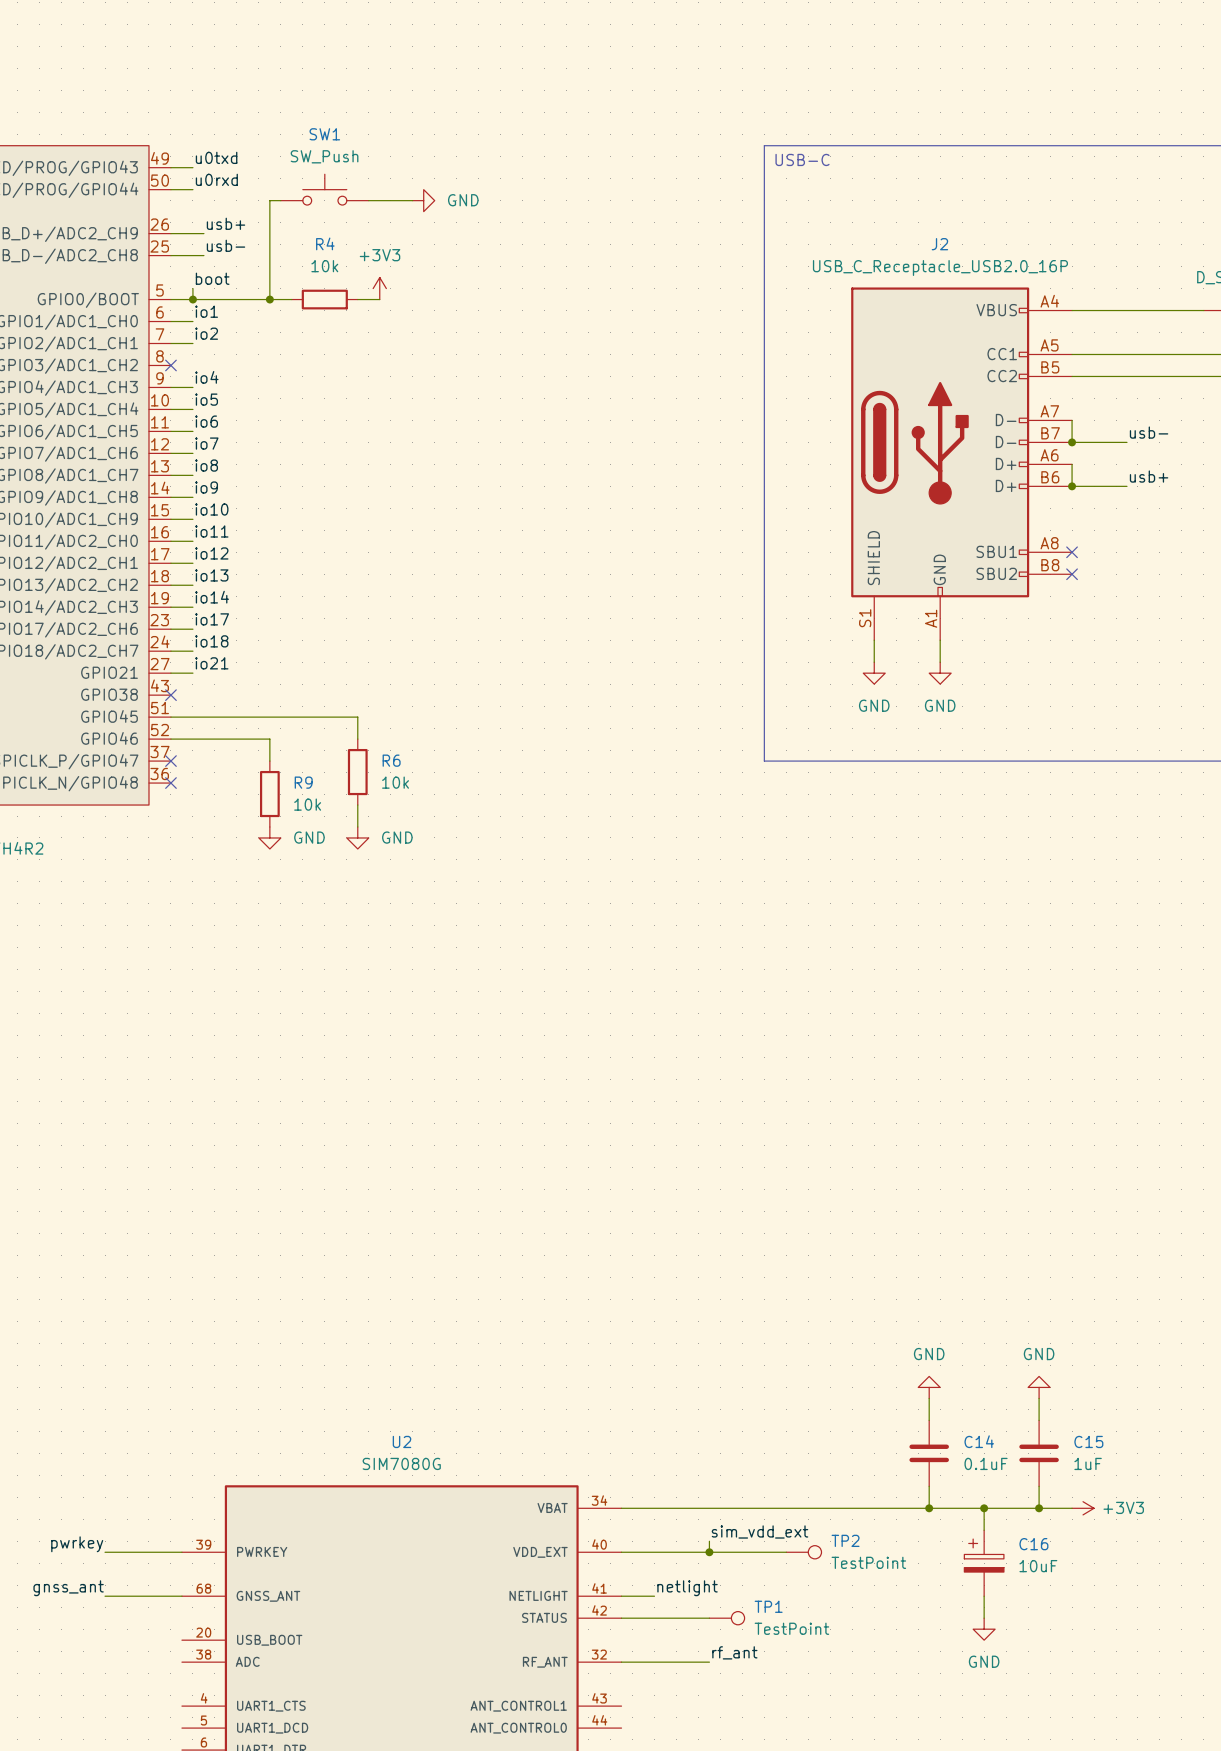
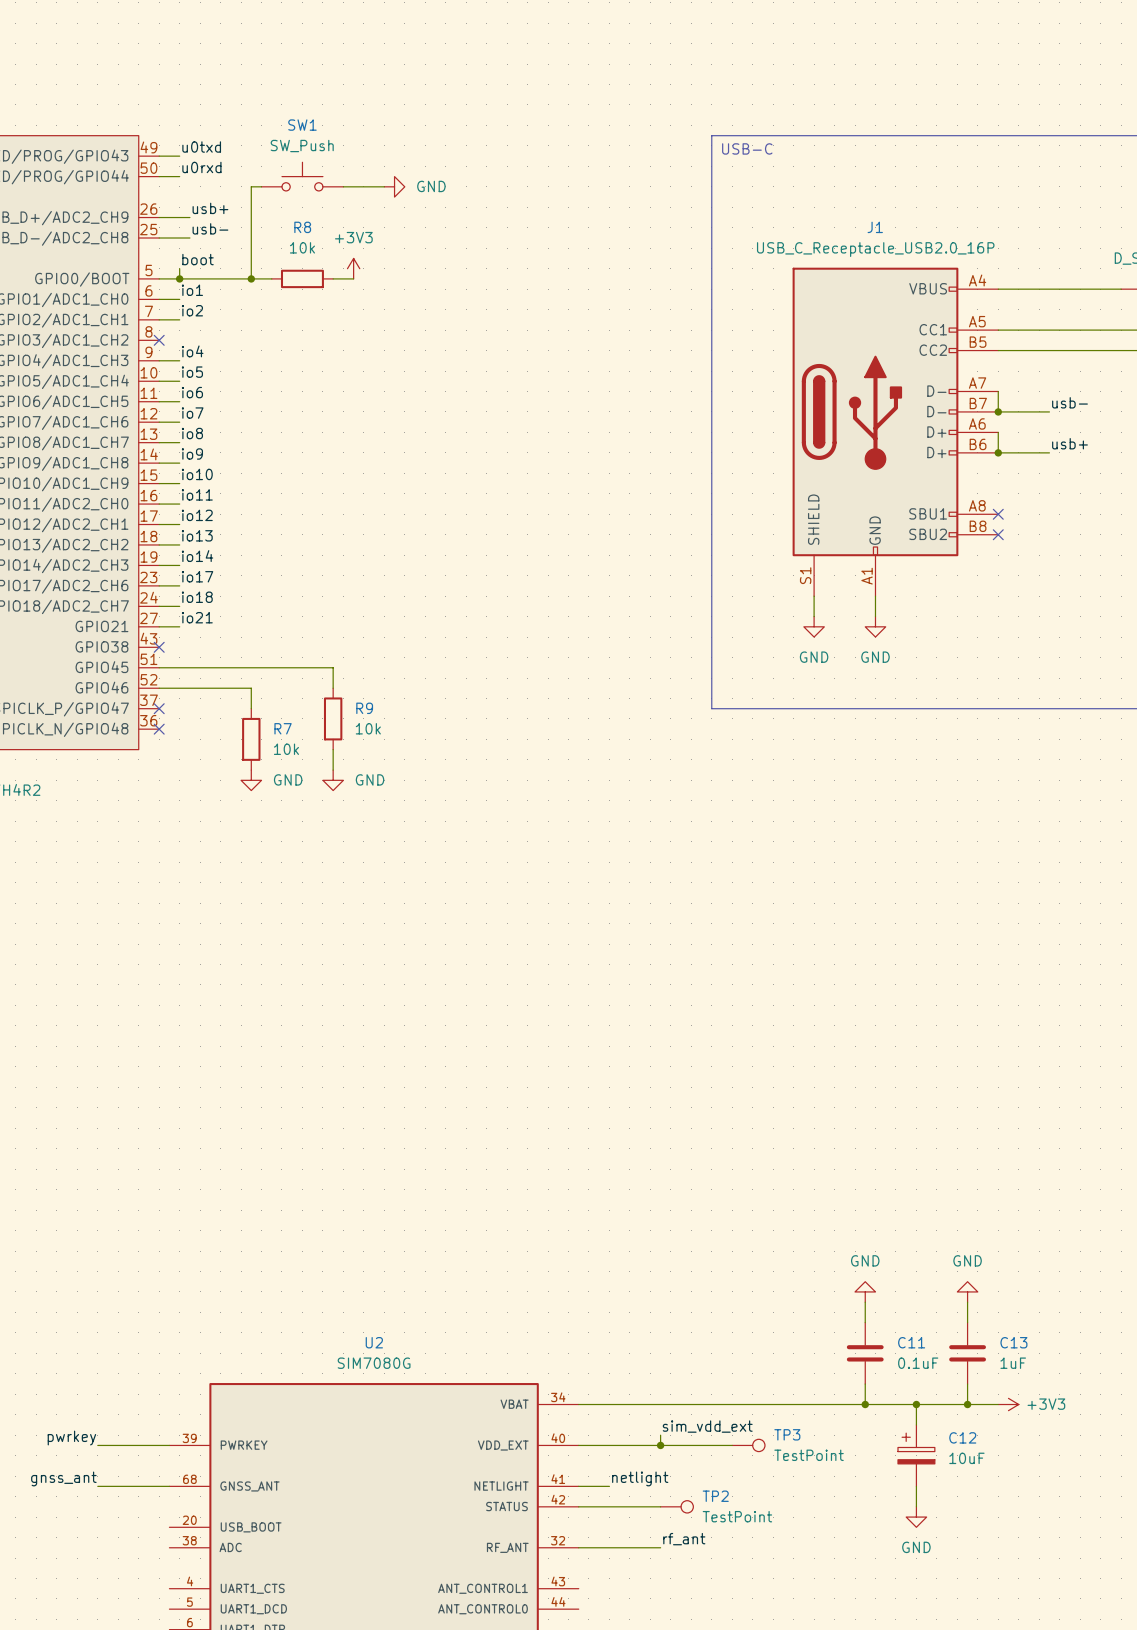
R4 name: R4 (325, 243) -> R8 (302, 227)
J2 name: J2 (939, 244) -> J1 (875, 227)
R6 name: R6 (391, 760) -> R9 (364, 708)
R9 name: R9 (303, 782) -> R7 (283, 728)
C14 name: C14 (979, 1441) -> C11 (911, 1342)
C15 name: C15 (1088, 1441) -> C13 (1013, 1342)
TP2 name: TP2 (845, 1540) -> TP3 (787, 1434)
C16 name: C16 (1033, 1544) -> C12 (962, 1437)
TP1 name: TP1 (768, 1606) -> TP2 (715, 1496)

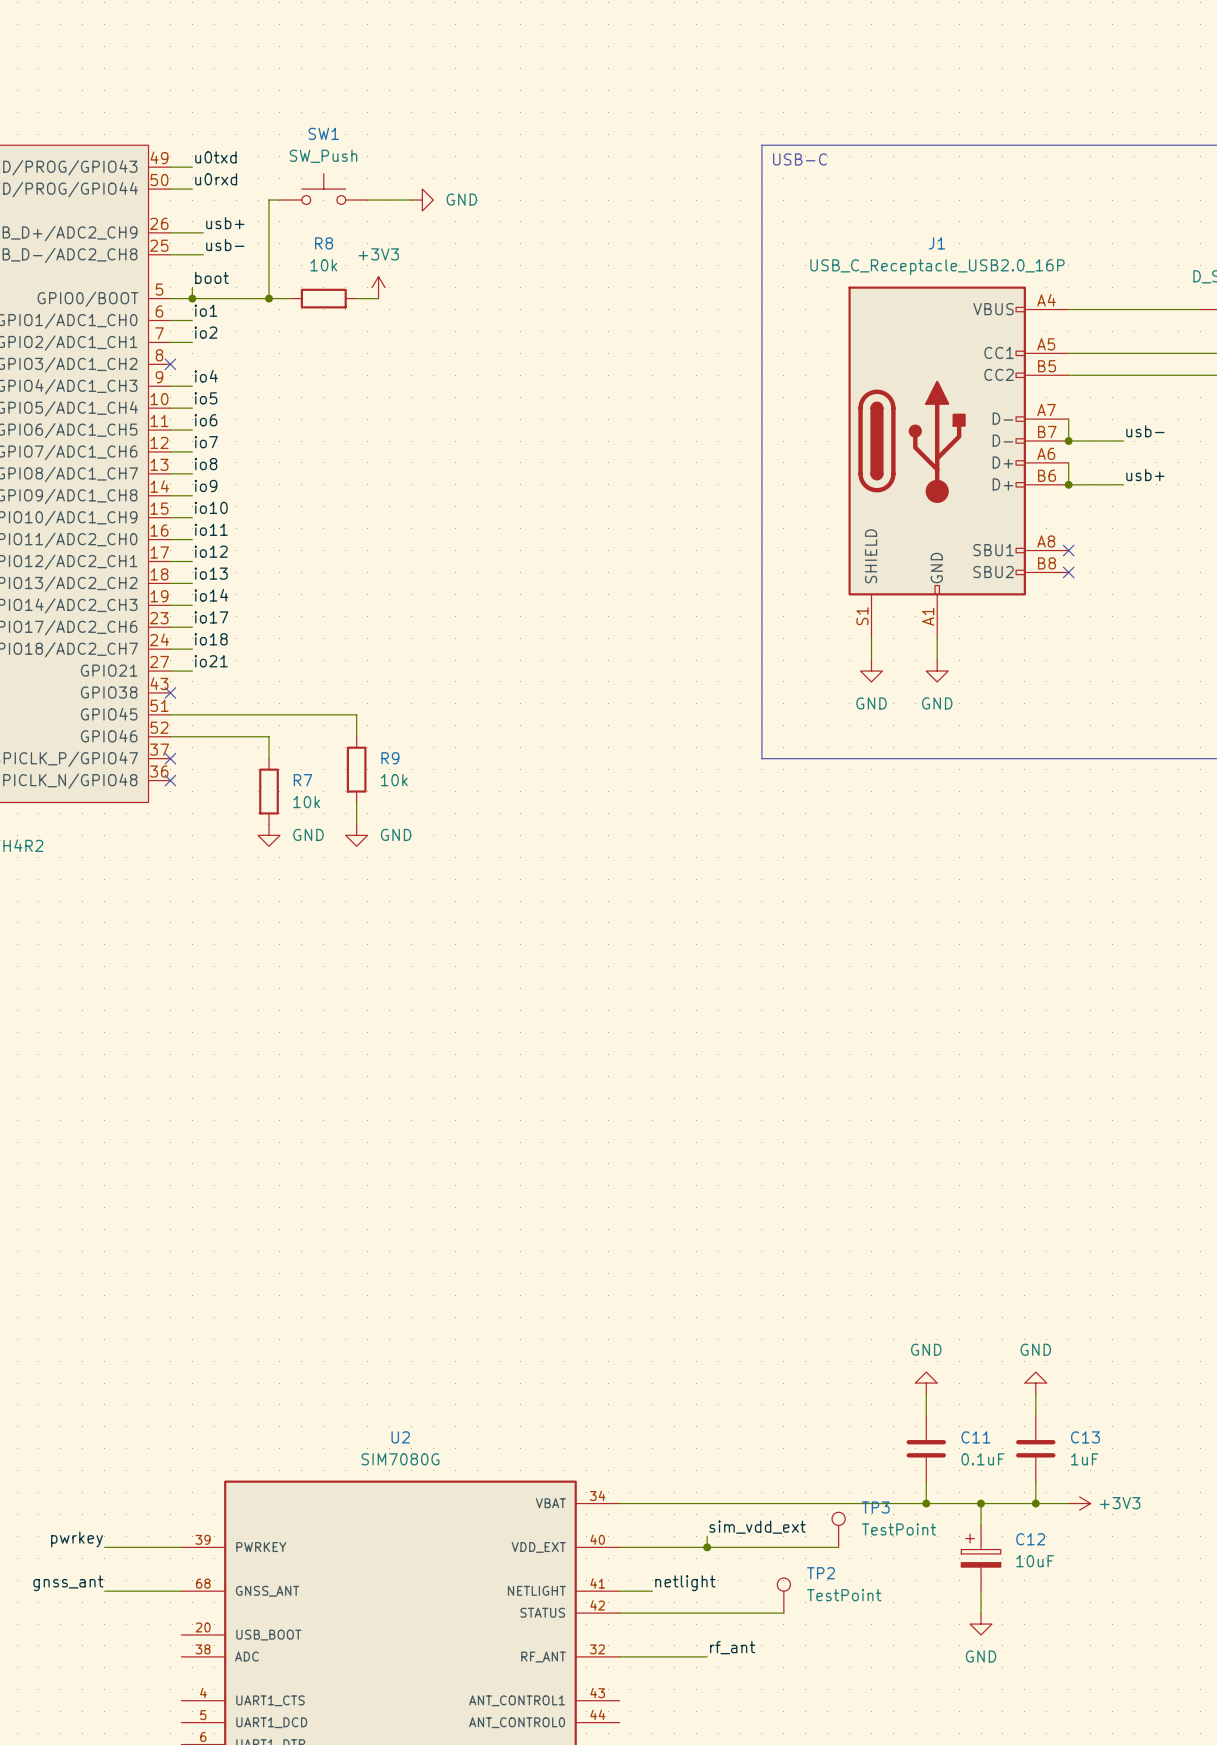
wire: none -> (783, 1547) (838, 1547)
TP3 position: (748, 1445) -> (838, 1529)
TP3 rotation: 0° (758, 1445) -> 90° counterclockwise (838, 1518)
wire: none -> (707, 1613) (783, 1613)
TP2 position: (676, 1506) -> (783, 1595)
TP2 rotation: 0° (687, 1506) -> 90° counterclockwise (783, 1584)

